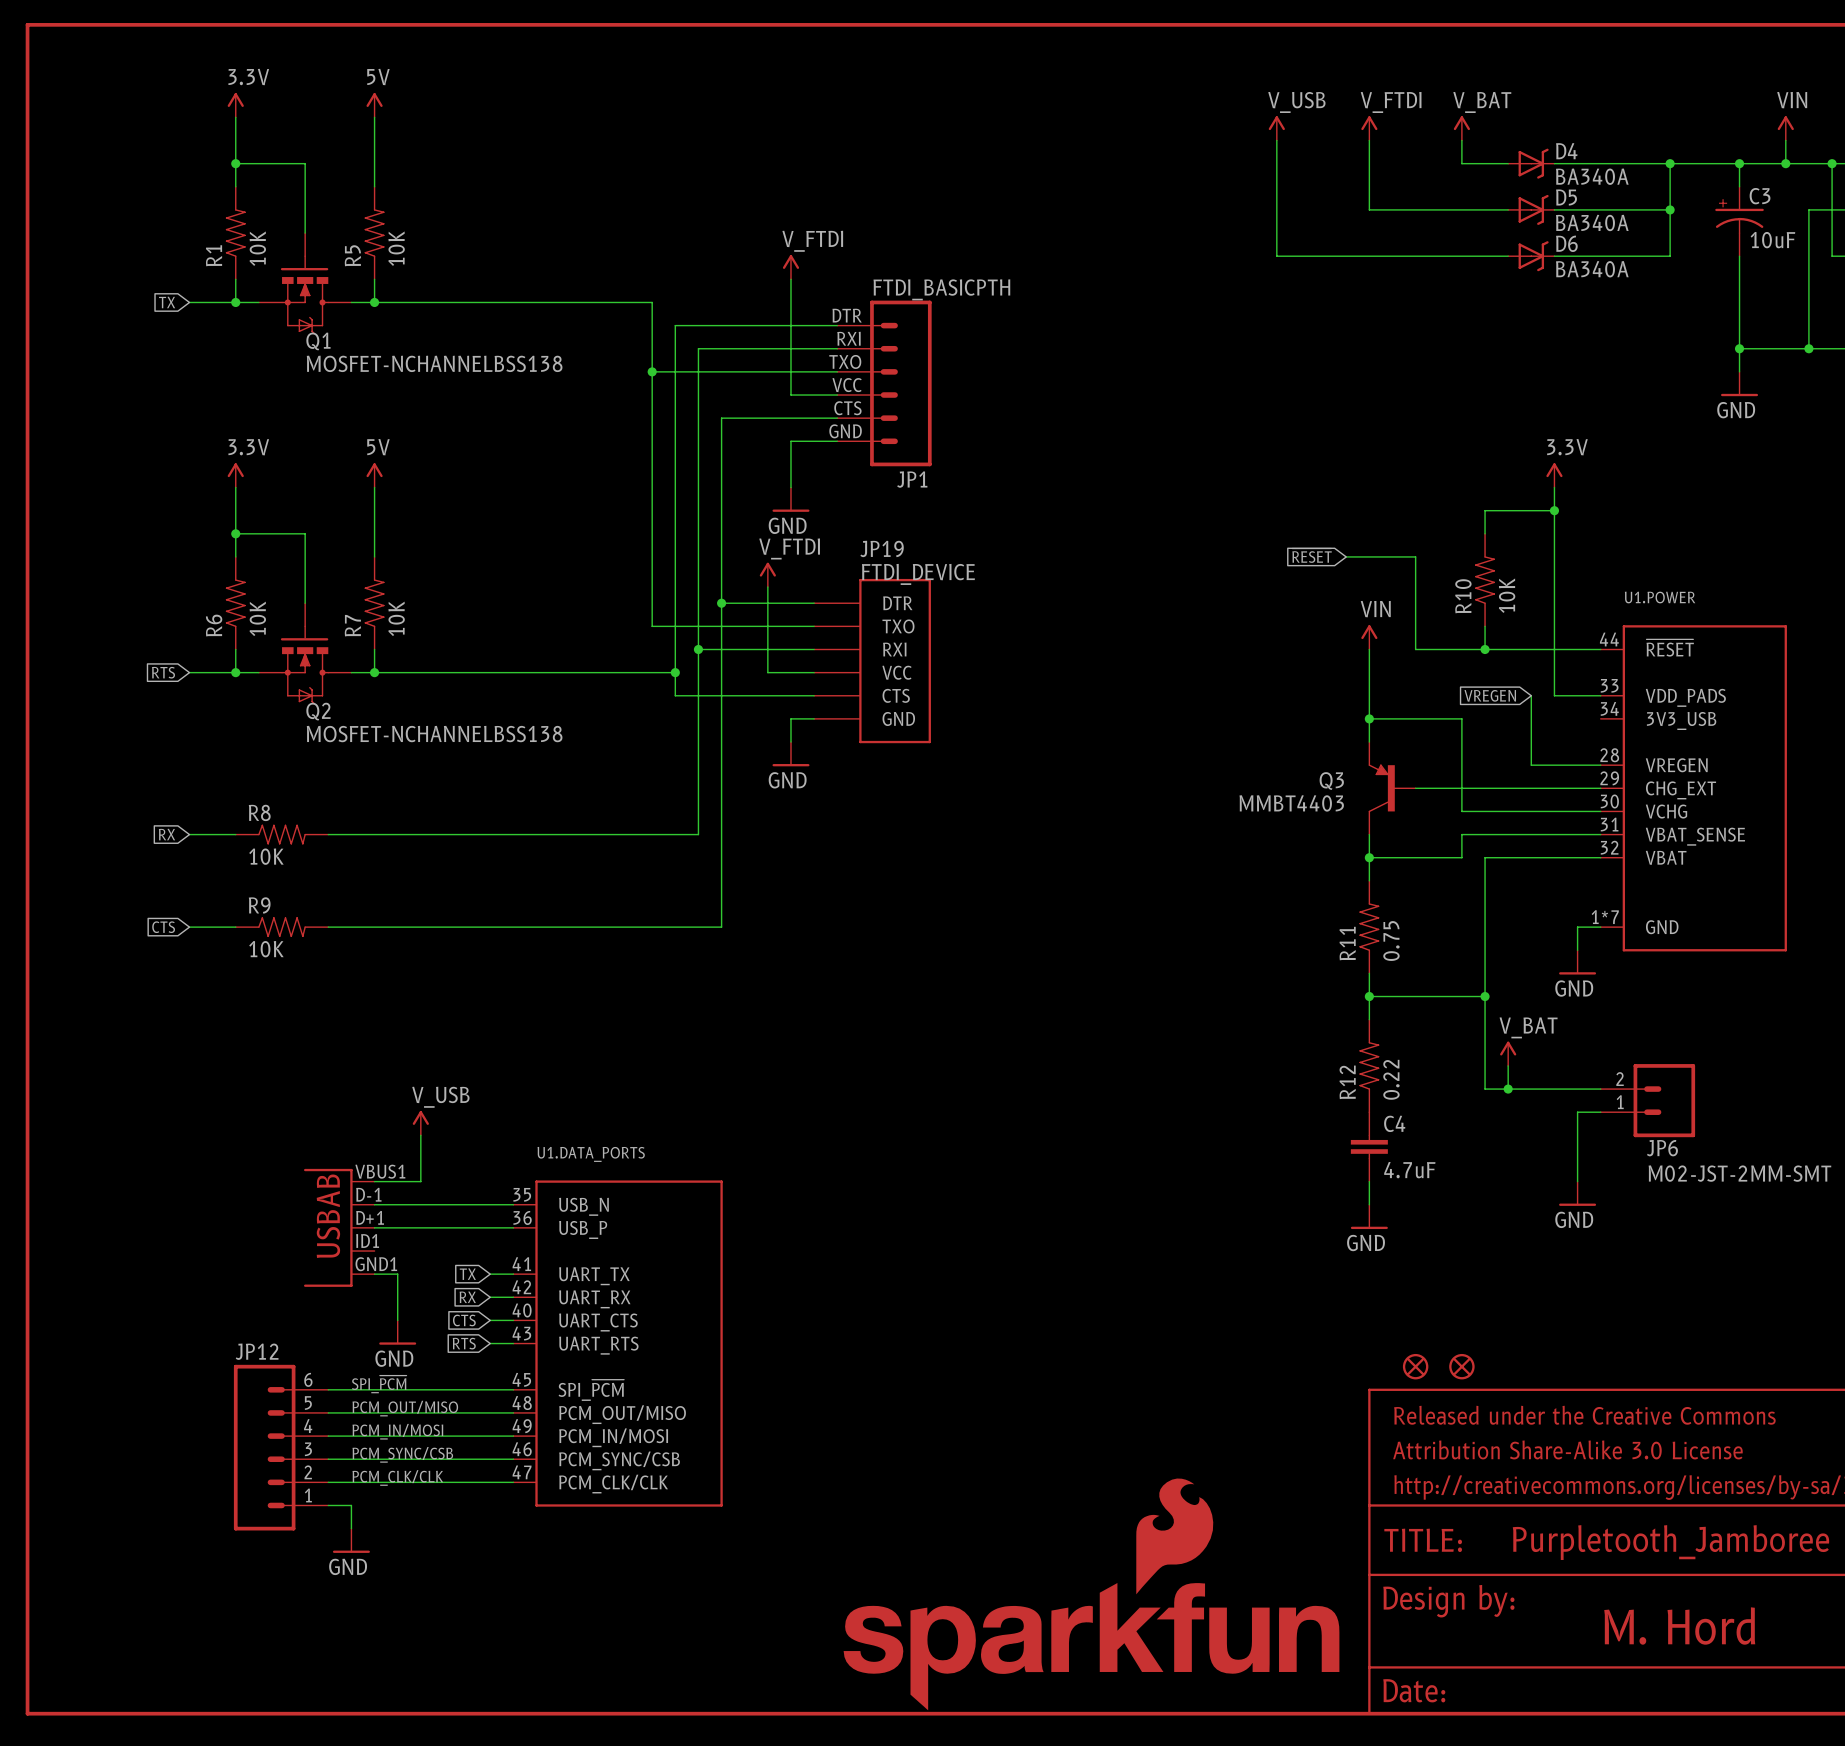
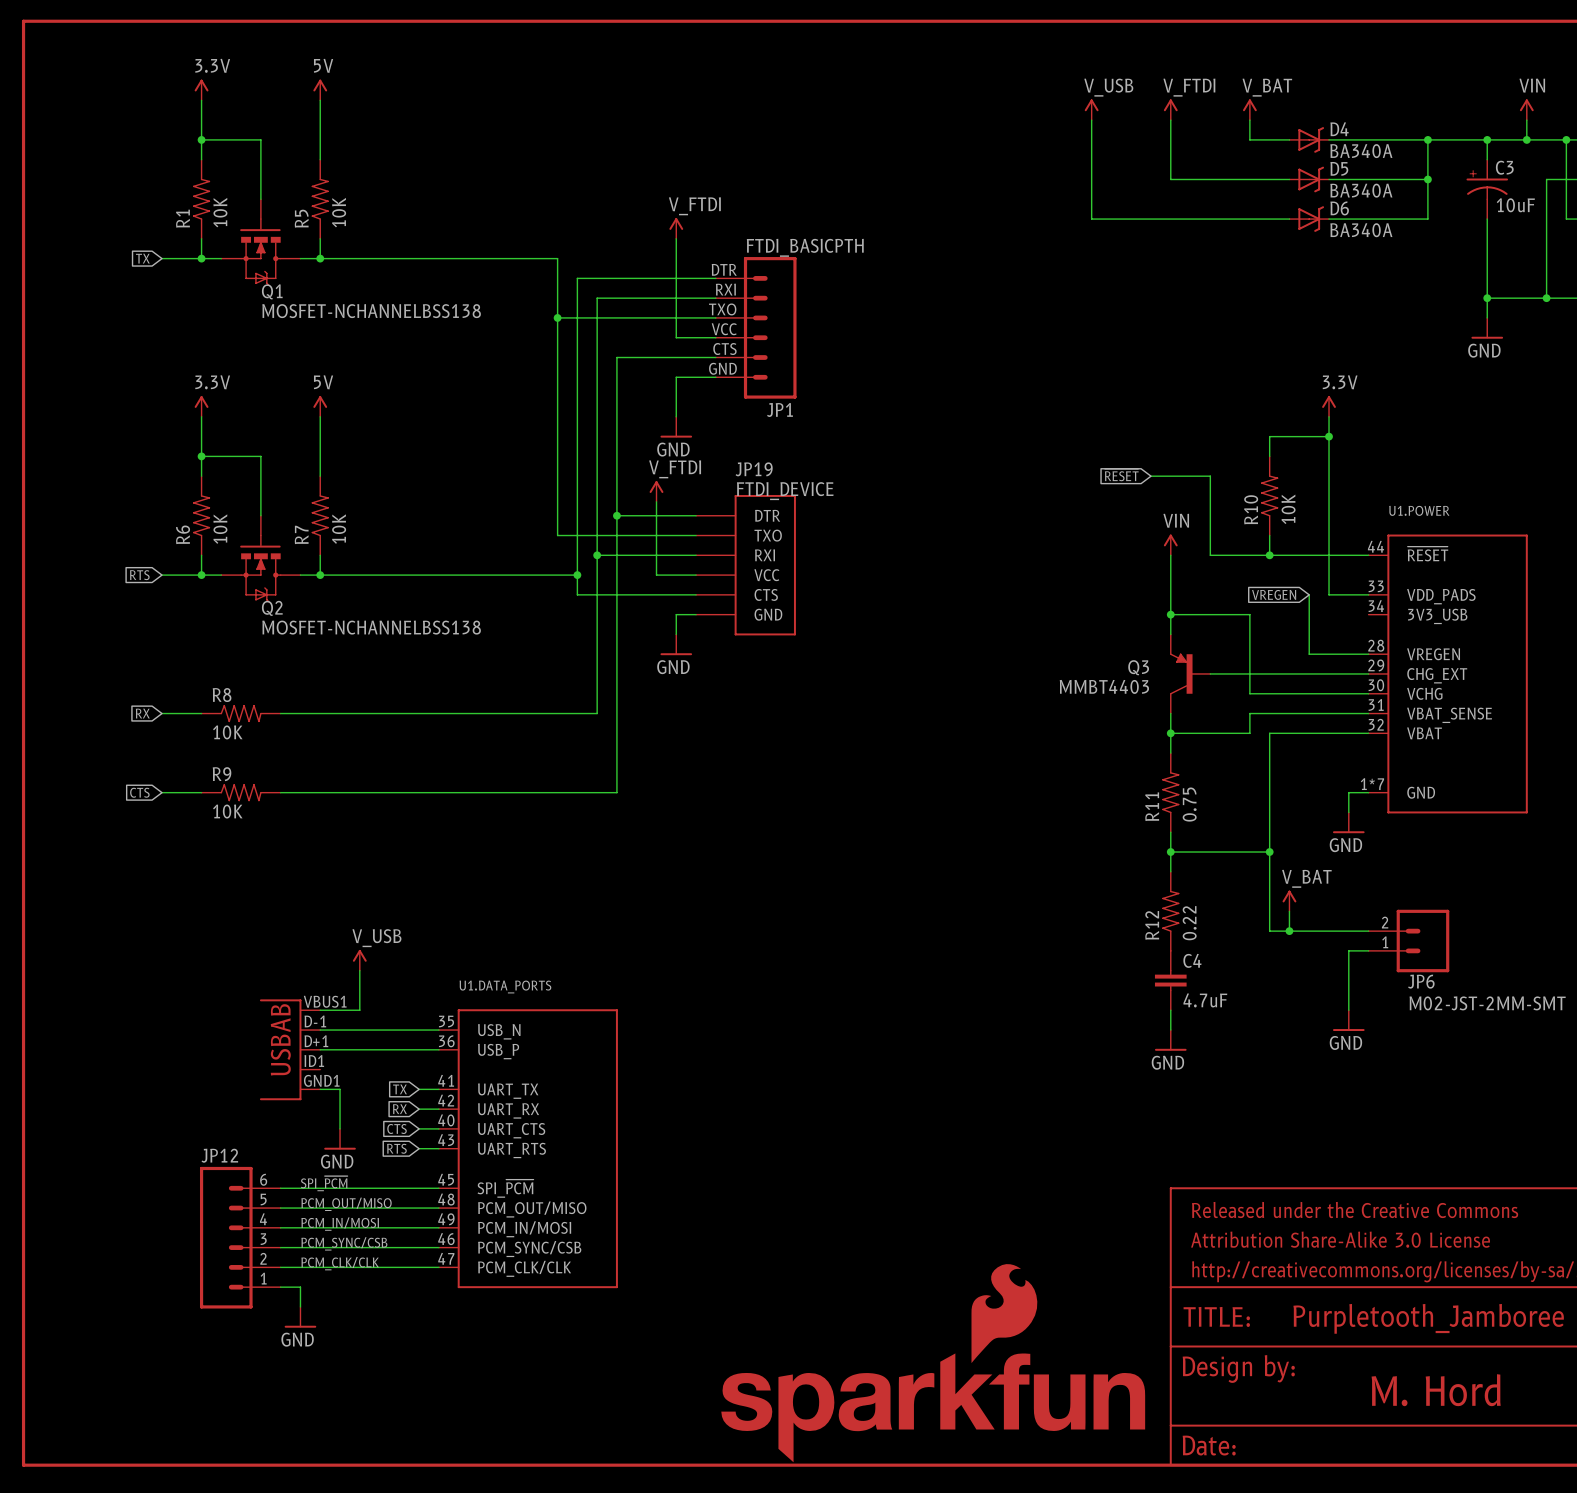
part: (1415, 1366) -> none
part: (1461, 1366) -> none

